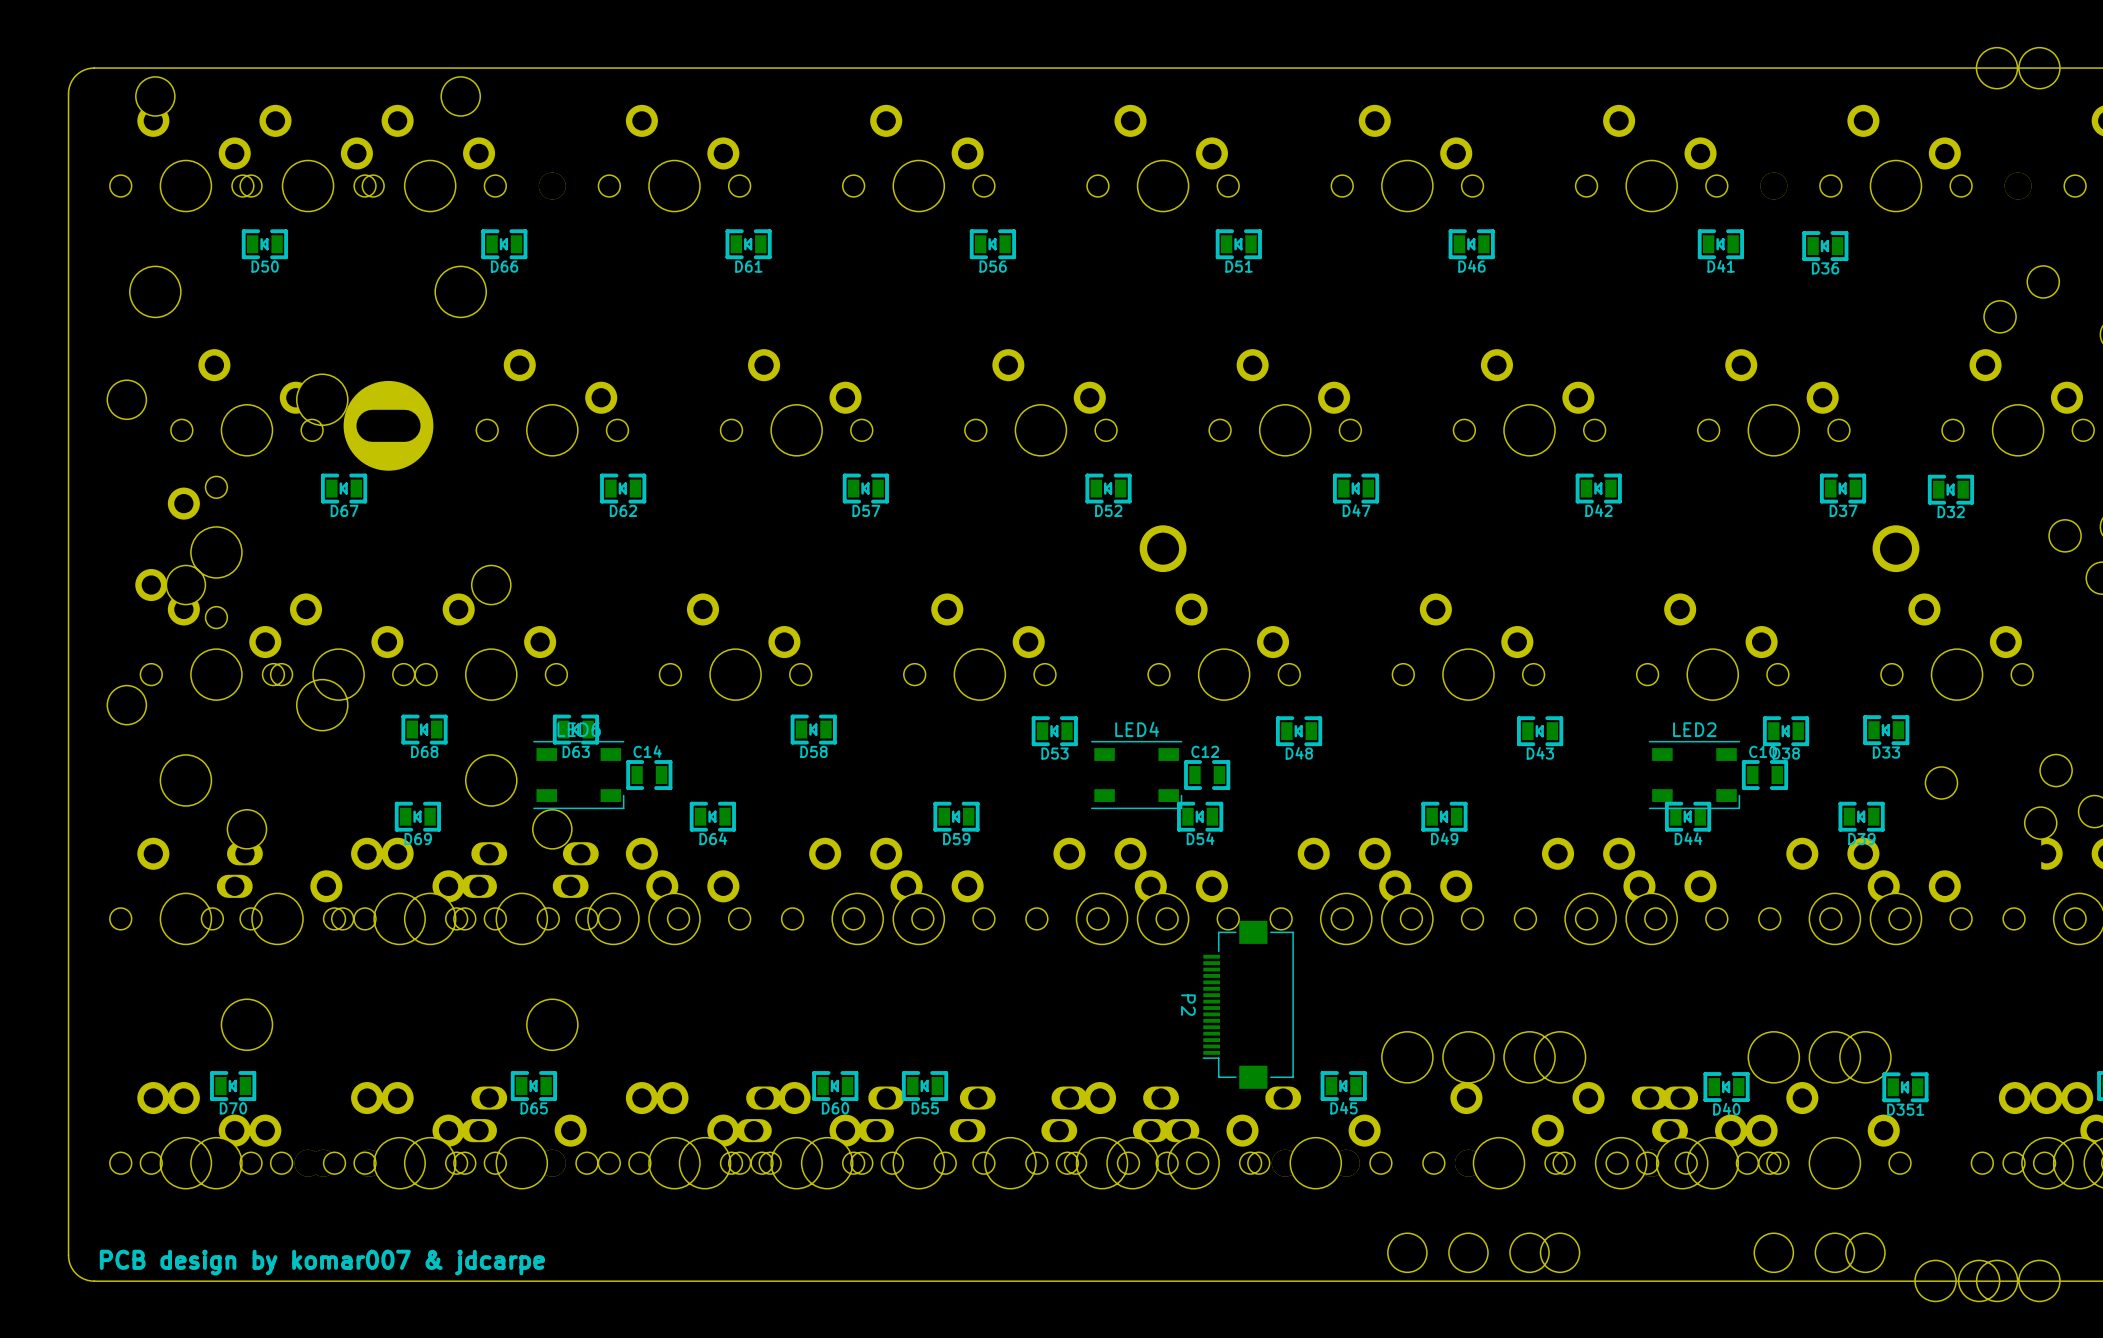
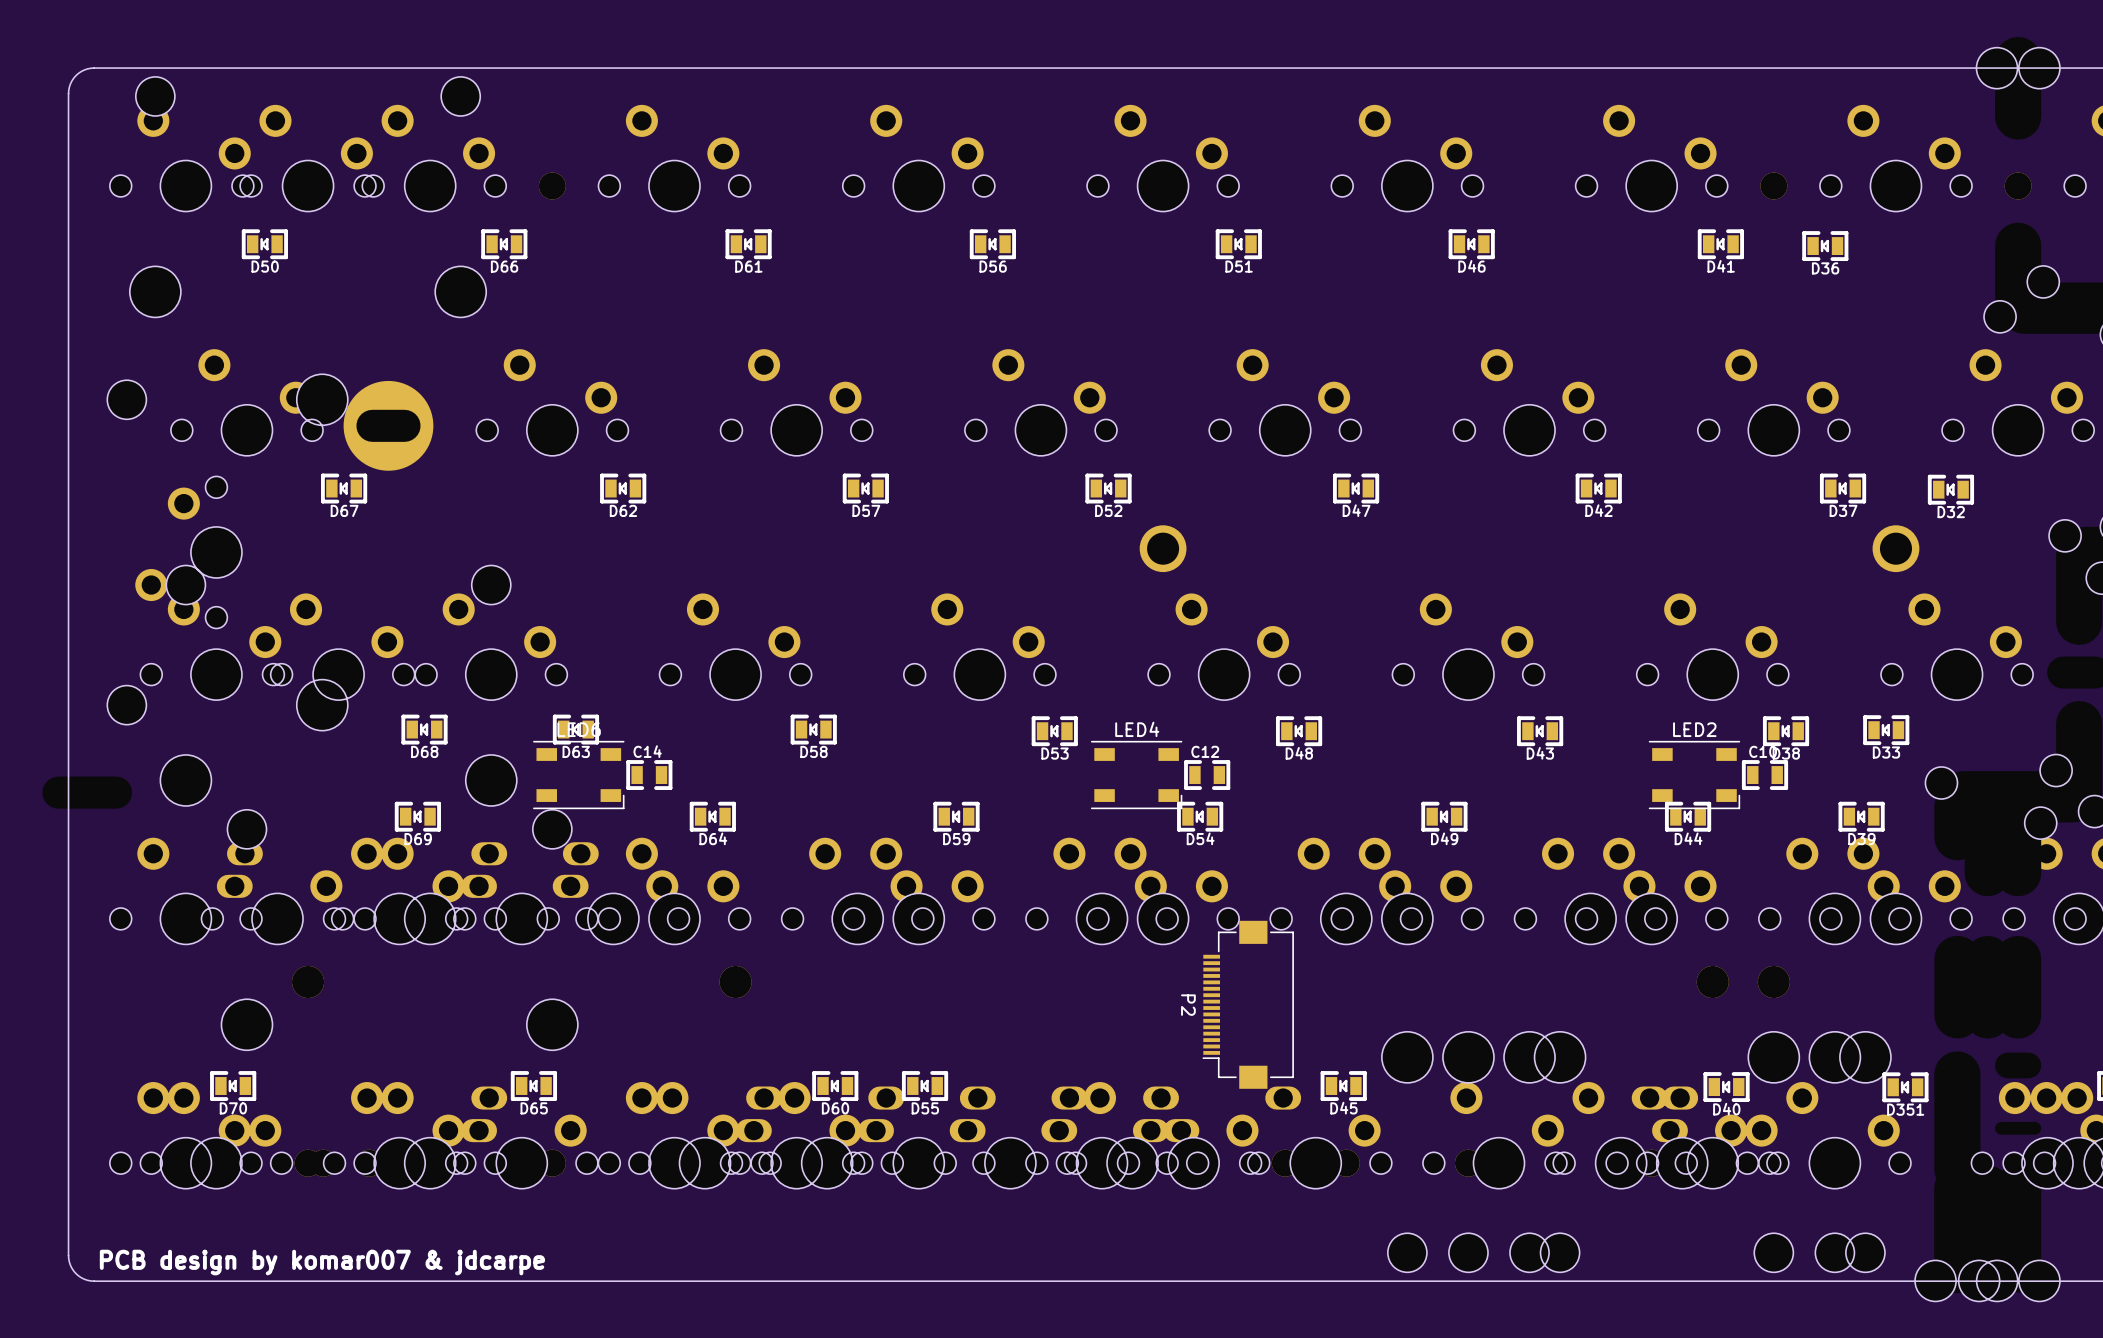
part: none -> (308, 982)
part: none -> (735, 982)
part: none -> (1712, 982)
part: none -> (1773, 982)

